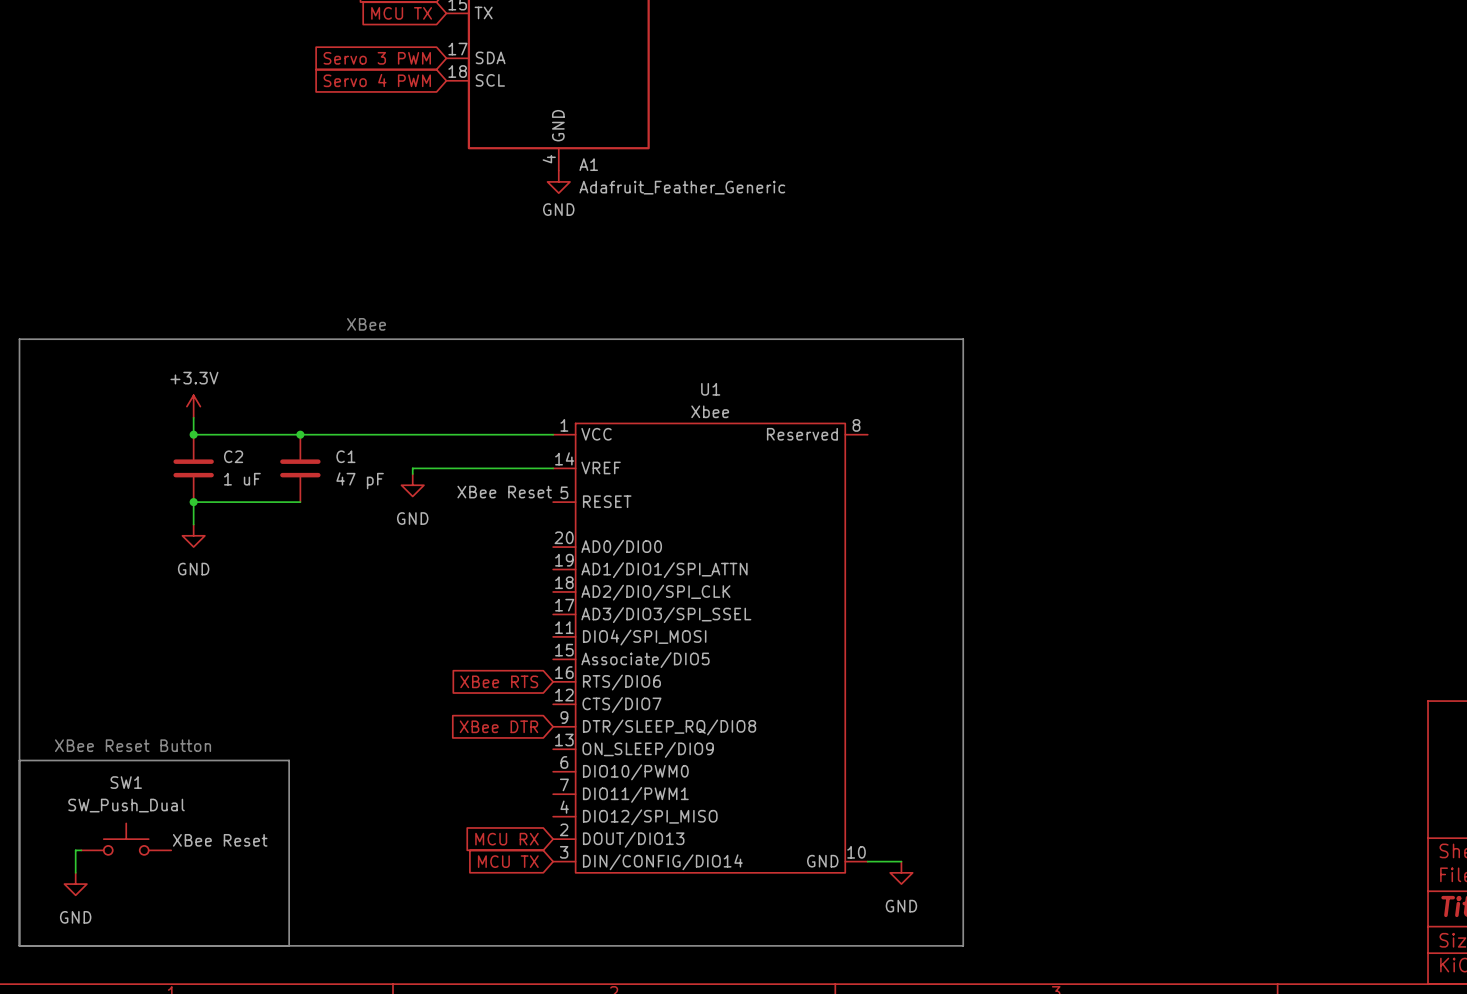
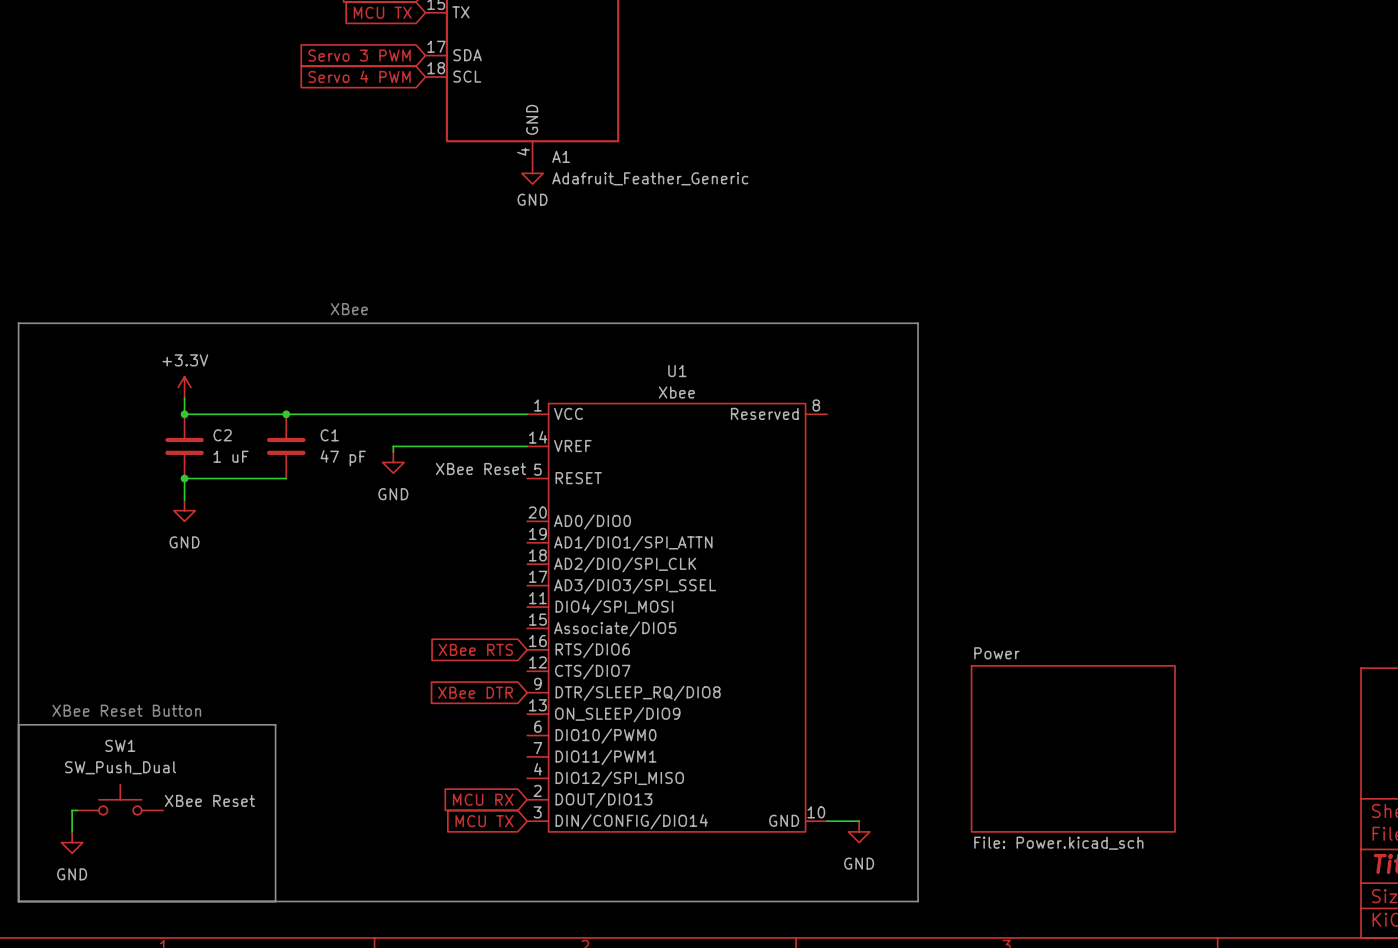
sheet Power: none -> File: Power.kicad_sch (1073, 748)

